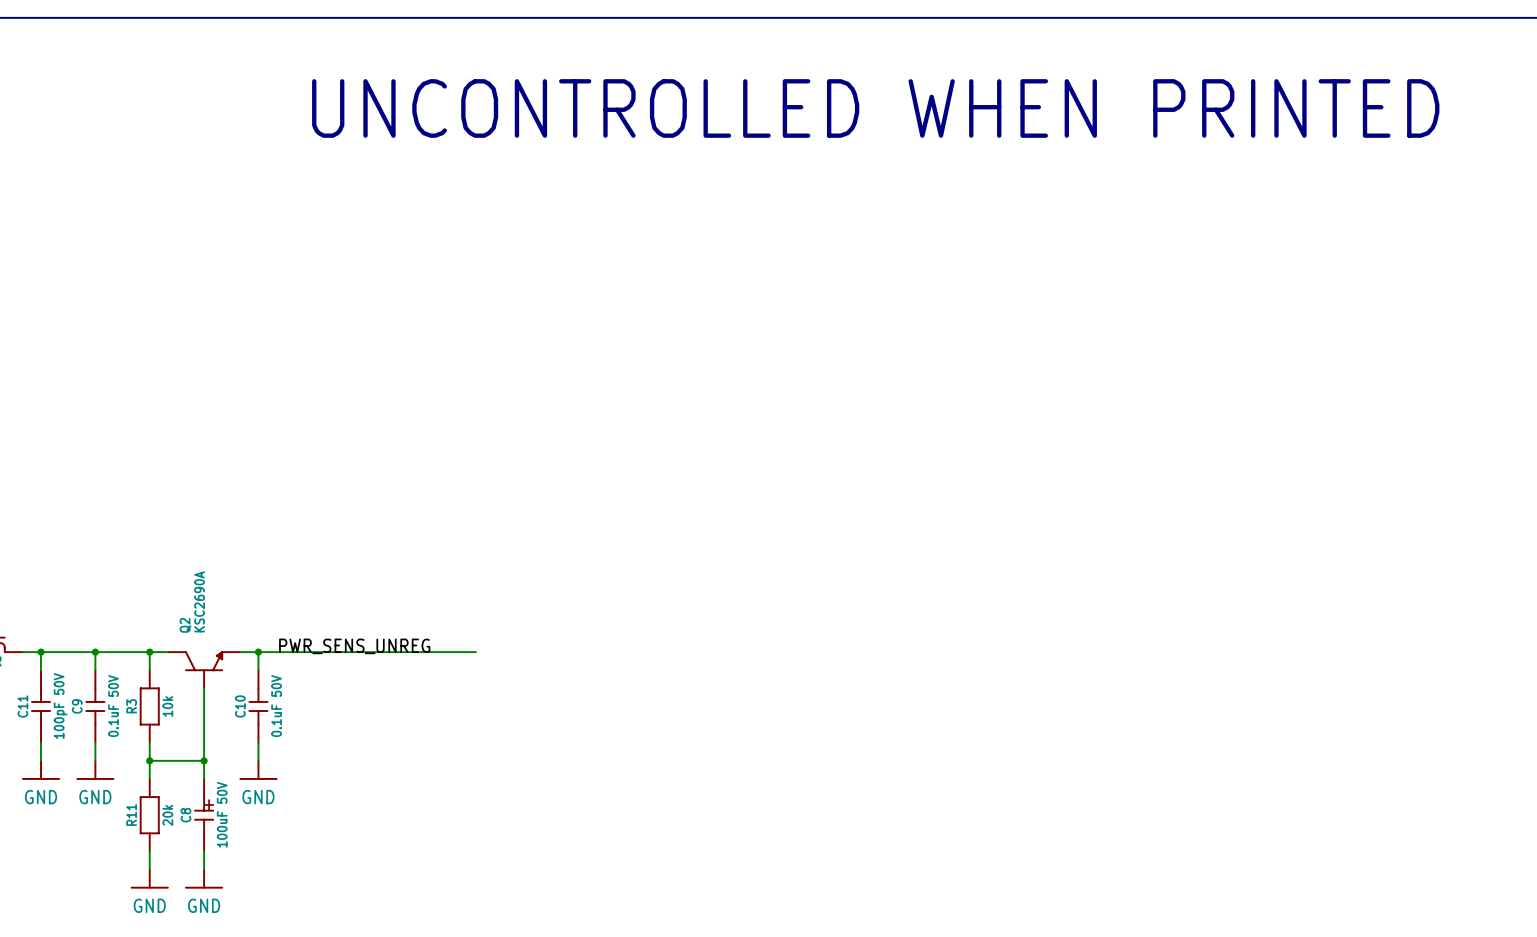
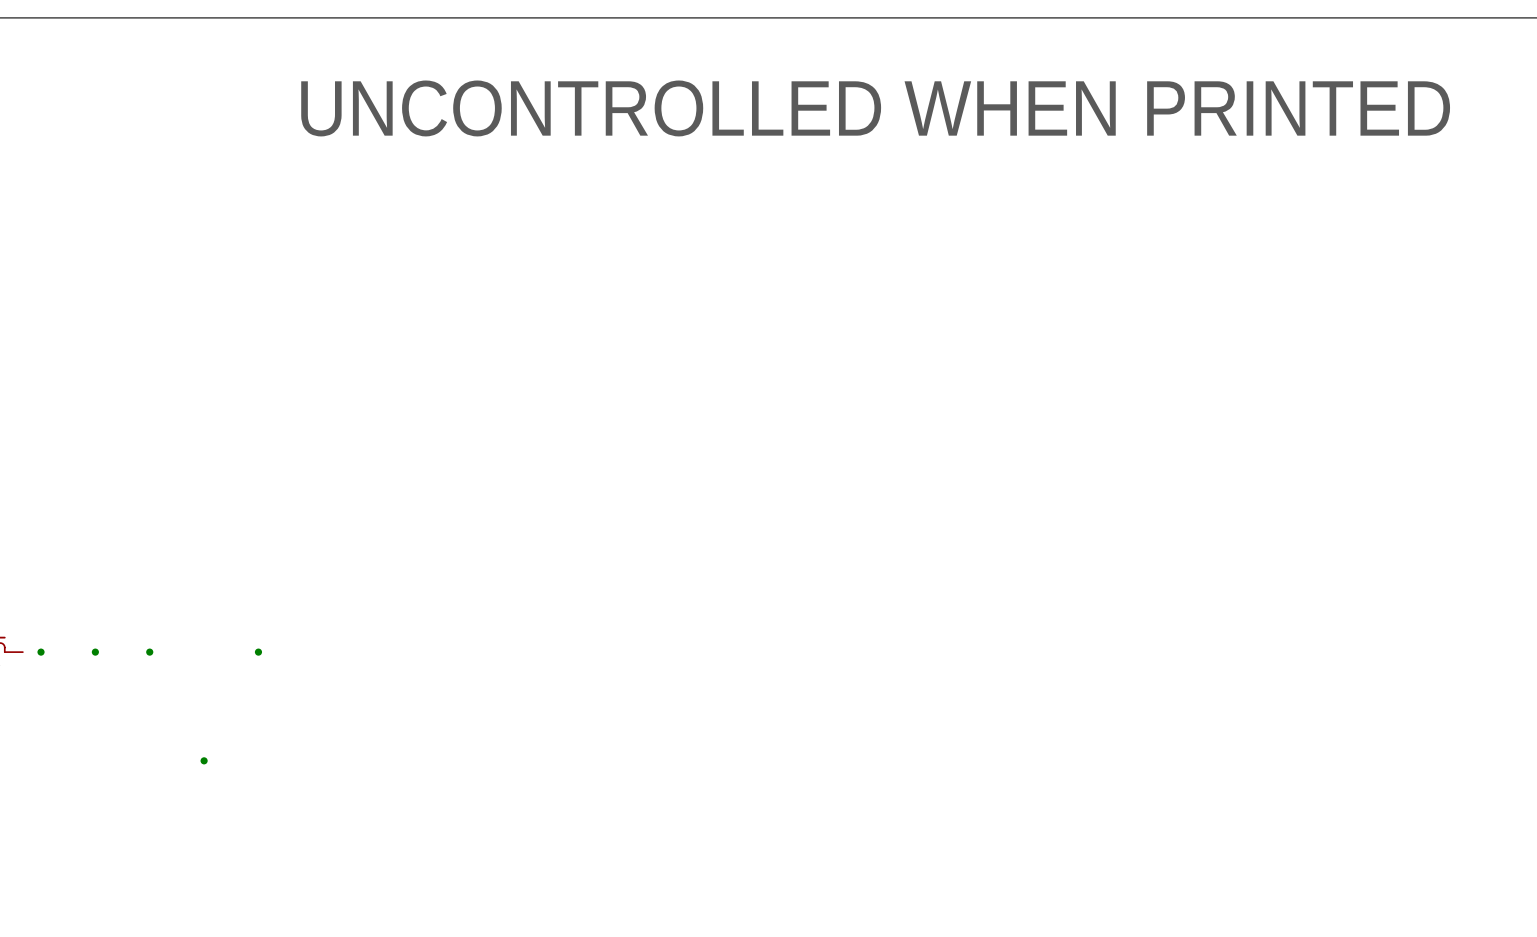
label: PWR_SENS_UNREG (354, 646) -> none
wire: (22, 652) (167, 652) -> none
wire: (41, 652) (41, 670) -> none
wire: (95, 652) (95, 670) -> none
wire: (149, 652) (149, 670) -> none
wire: (240, 652) (475, 652) -> none
wire: (258, 652) (258, 670) -> none
Q2: KSC2690A (204, 669) -> none
wire: (204, 688) (204, 778) -> none
C11: 100pF 50V (41, 706) -> none
C9: 0.1uF 50V (95, 706) -> none
R3: 10k (149, 706) -> none
C10: 0.1uF 50V (258, 706) -> none
wire: (41, 742) (41, 760) -> none
wire: (95, 742) (95, 760) -> none
wire: (149, 742) (149, 778) -> none
wire: (258, 742) (258, 760) -> none
wire: (149, 760) (204, 760) -> none
junction: (149, 760) -> none
power symbol: GND (41, 770) -> none
power symbol: GND (95, 770) -> none
power symbol: GND (258, 770) -> none
R11: 20k (149, 815) -> none
C8: 100uF 50V (204, 815) -> none
wire: (149, 851) (149, 869) -> none
wire: (204, 851) (204, 869) -> none
power symbol: GND (149, 878) -> none
power symbol: GND (204, 878) -> none

